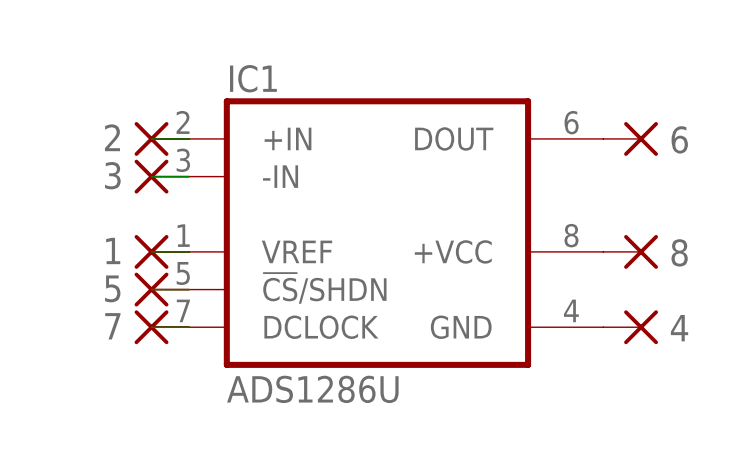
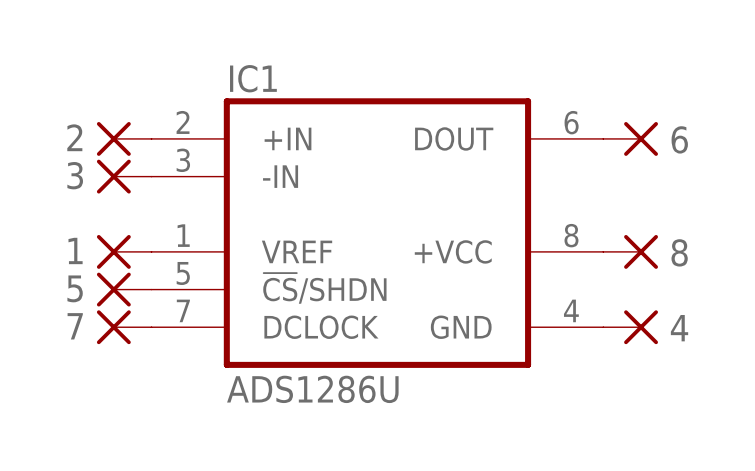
2 position: (161, 138) -> (124, 138)
3 position: (161, 176) -> (124, 176)
1 position: (161, 251) -> (124, 251)
5 position: (161, 289) -> (124, 289)
7 position: (161, 327) -> (124, 327)

